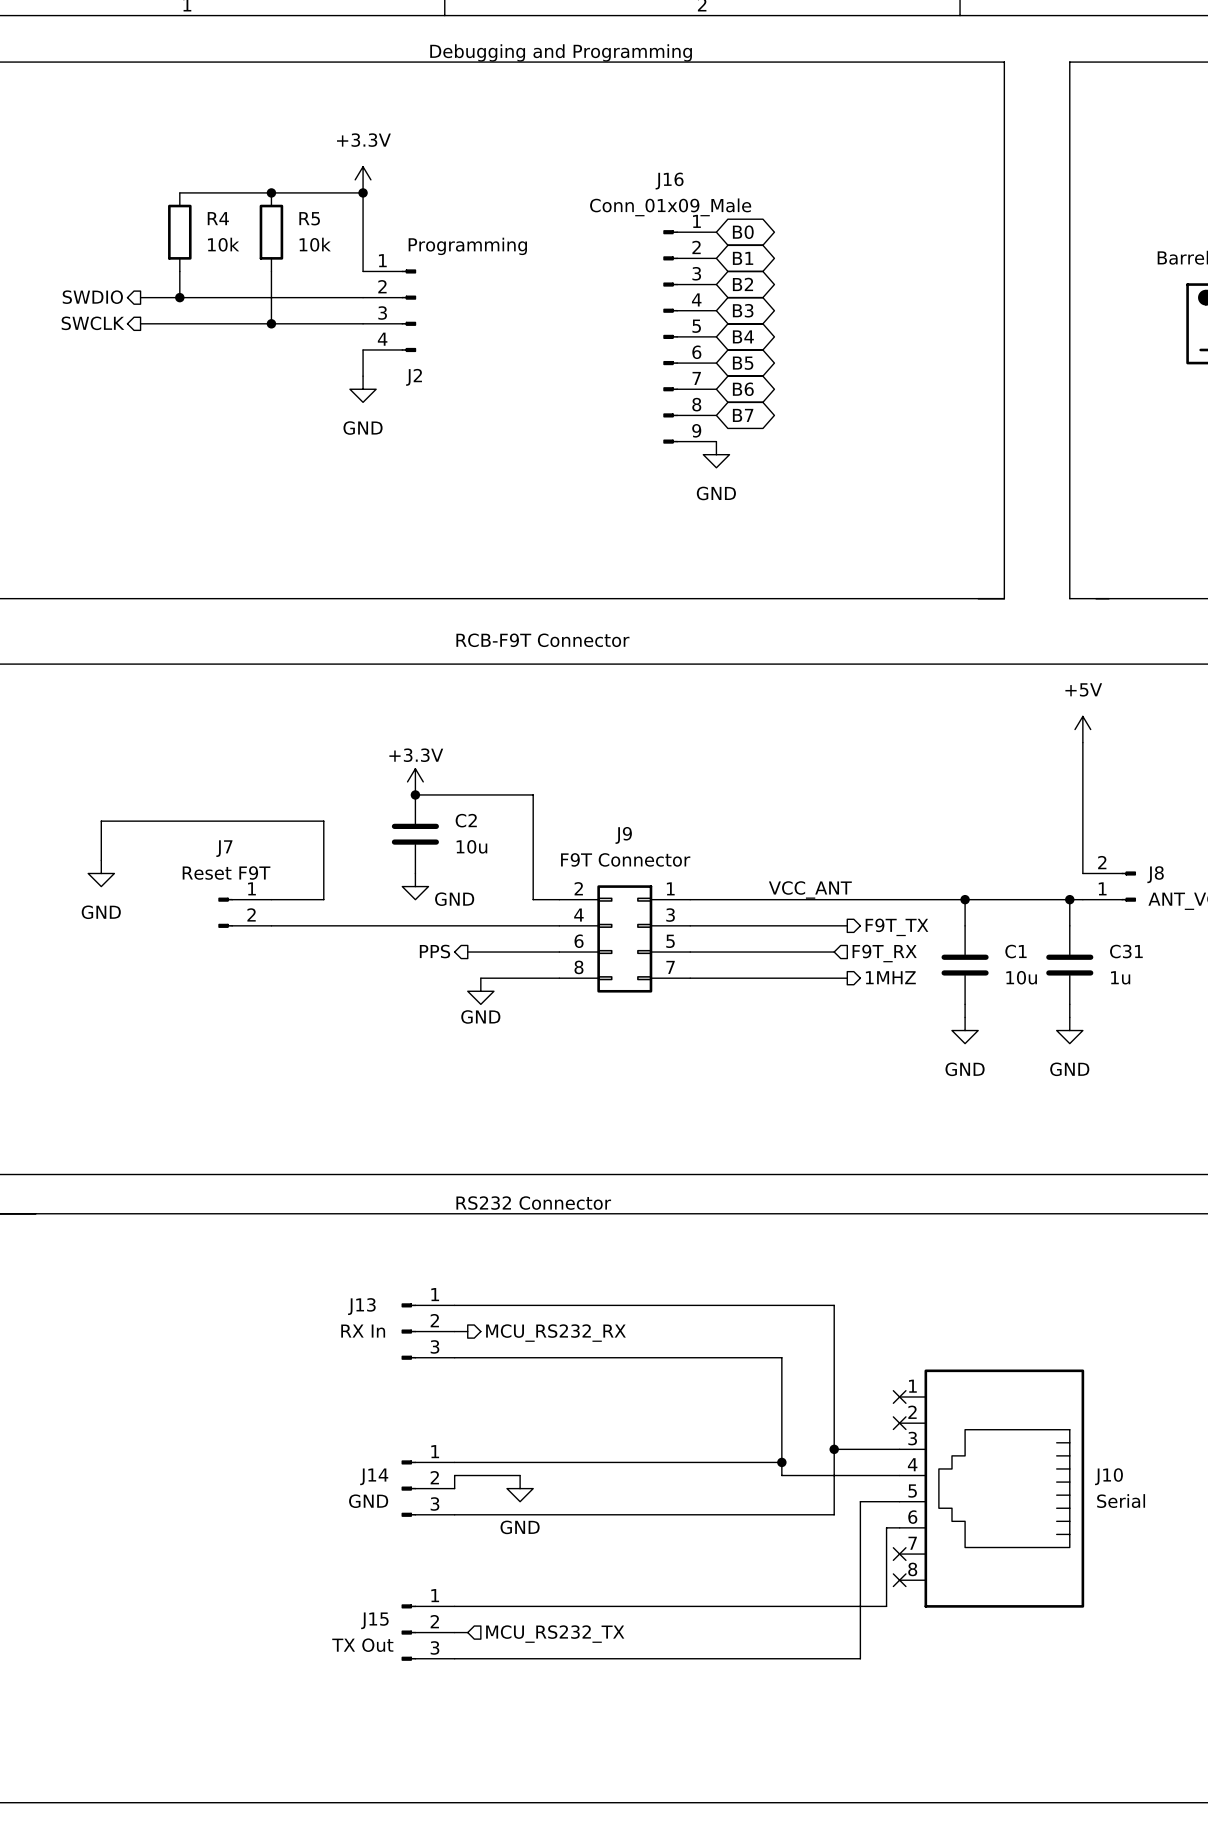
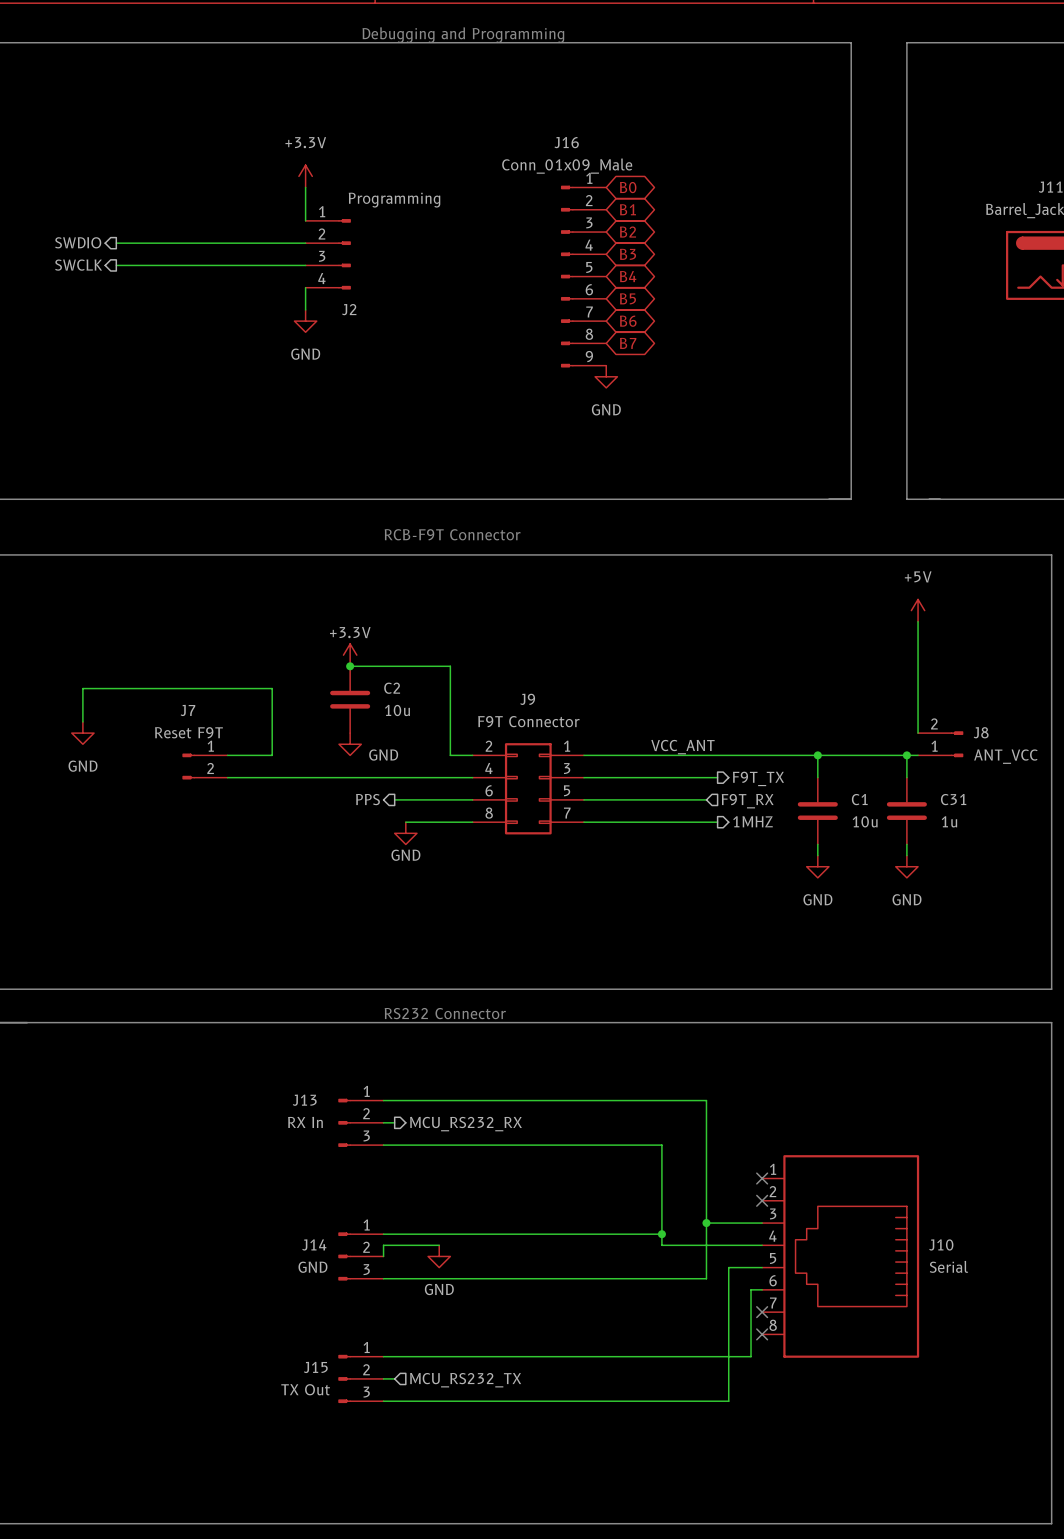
power symbol position: +3.3V (363, 179) -> +3.3V (305, 176)
wire: (179, 192) (363, 192) (363, 232) -> none
junction: (271, 192) -> none
junction: (363, 192) -> none
R4: 10k (179, 232) -> none
R5: 10k (271, 232) -> none
wire: (179, 271) (179, 297) -> none
wire: (271, 271) (271, 323) -> none
junction: (179, 297) -> none
junction: (271, 323) -> none

